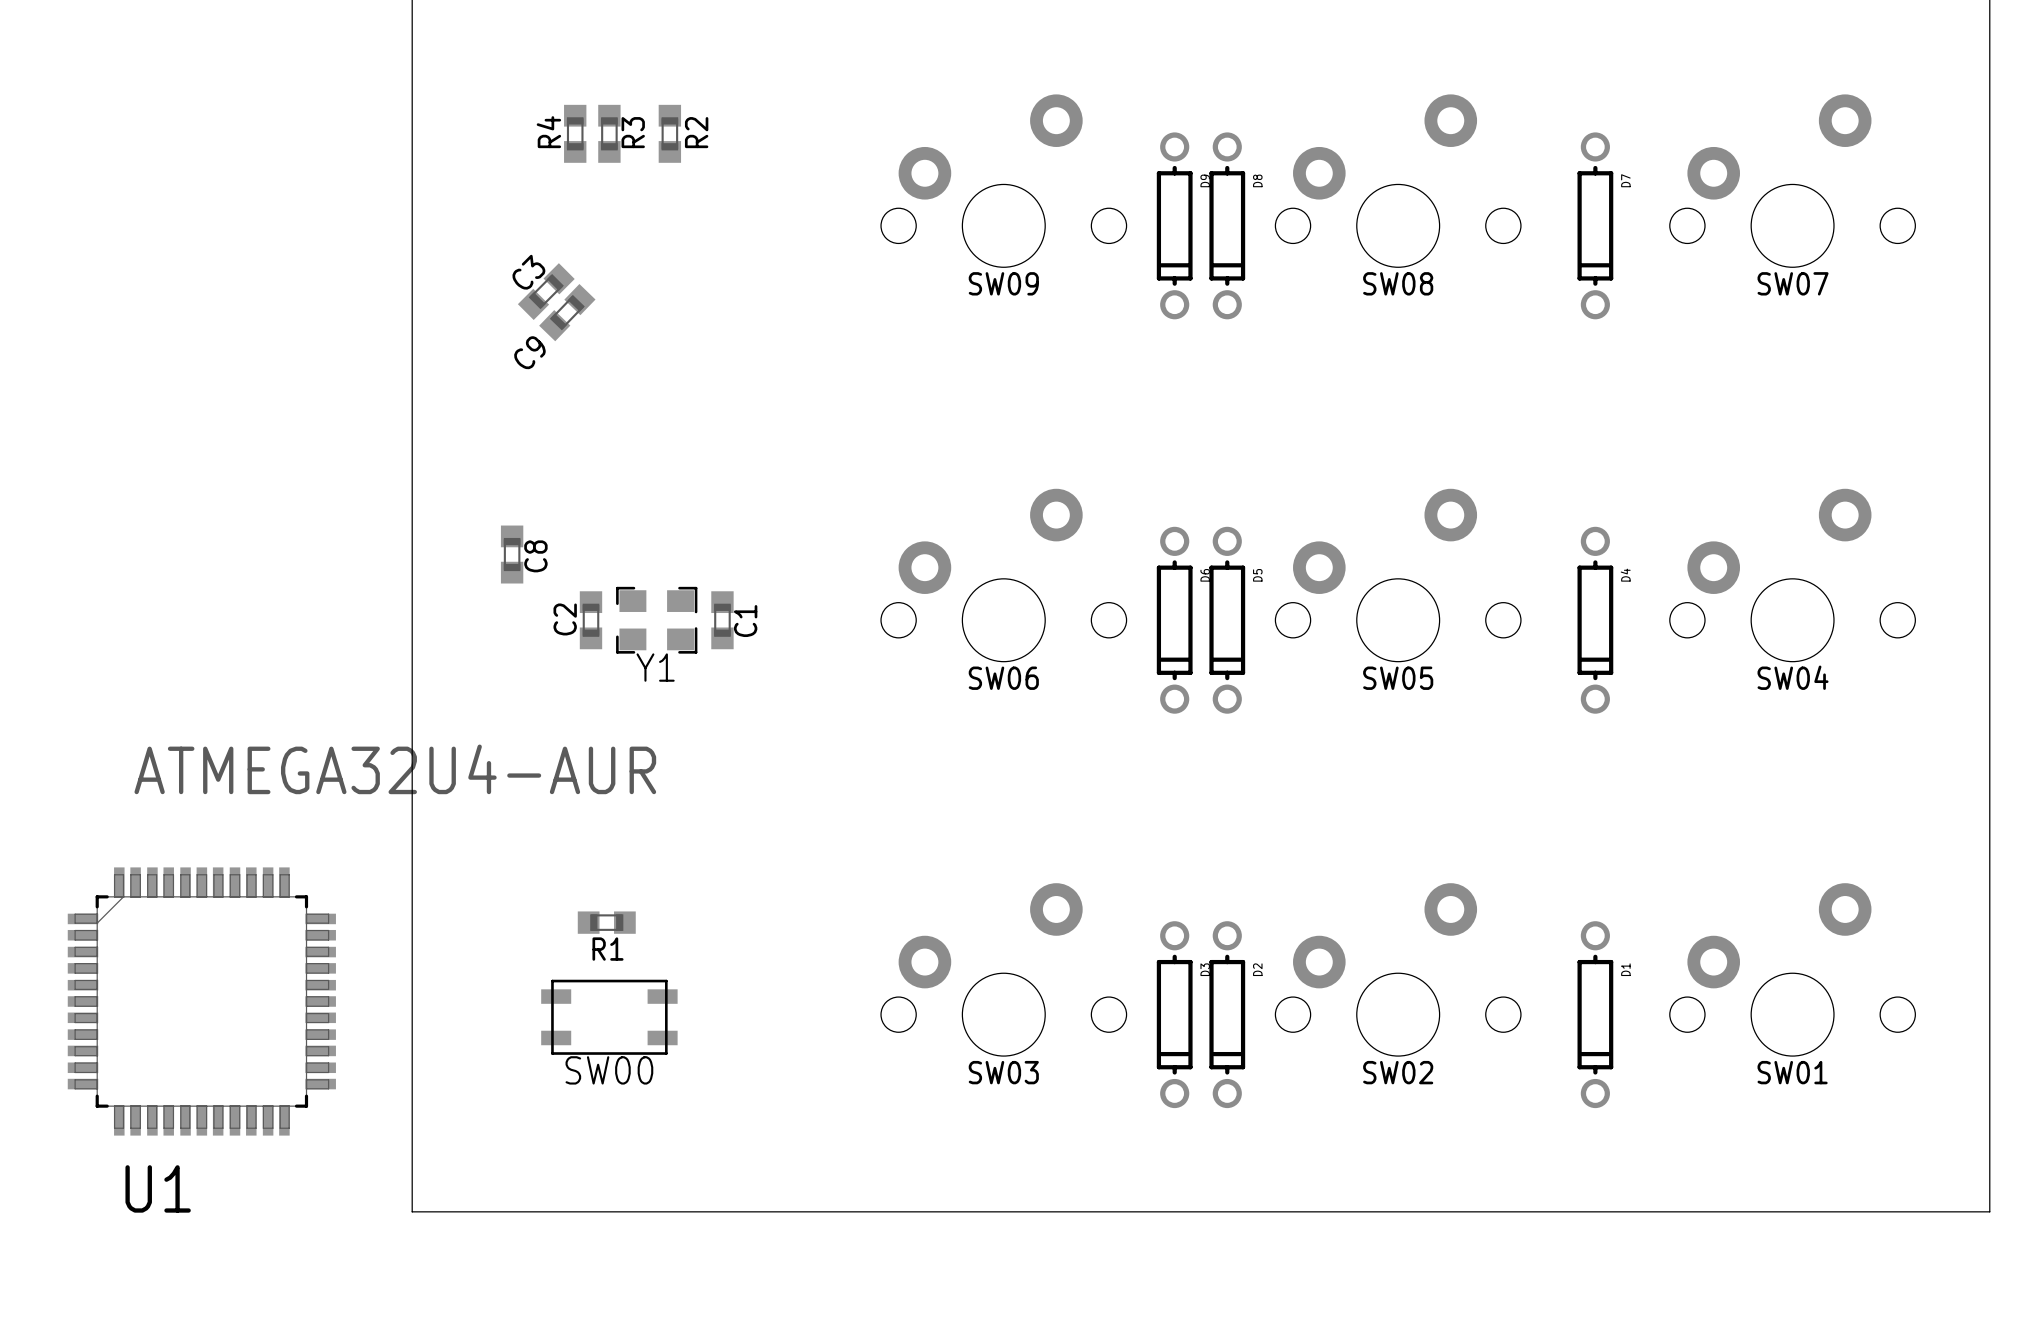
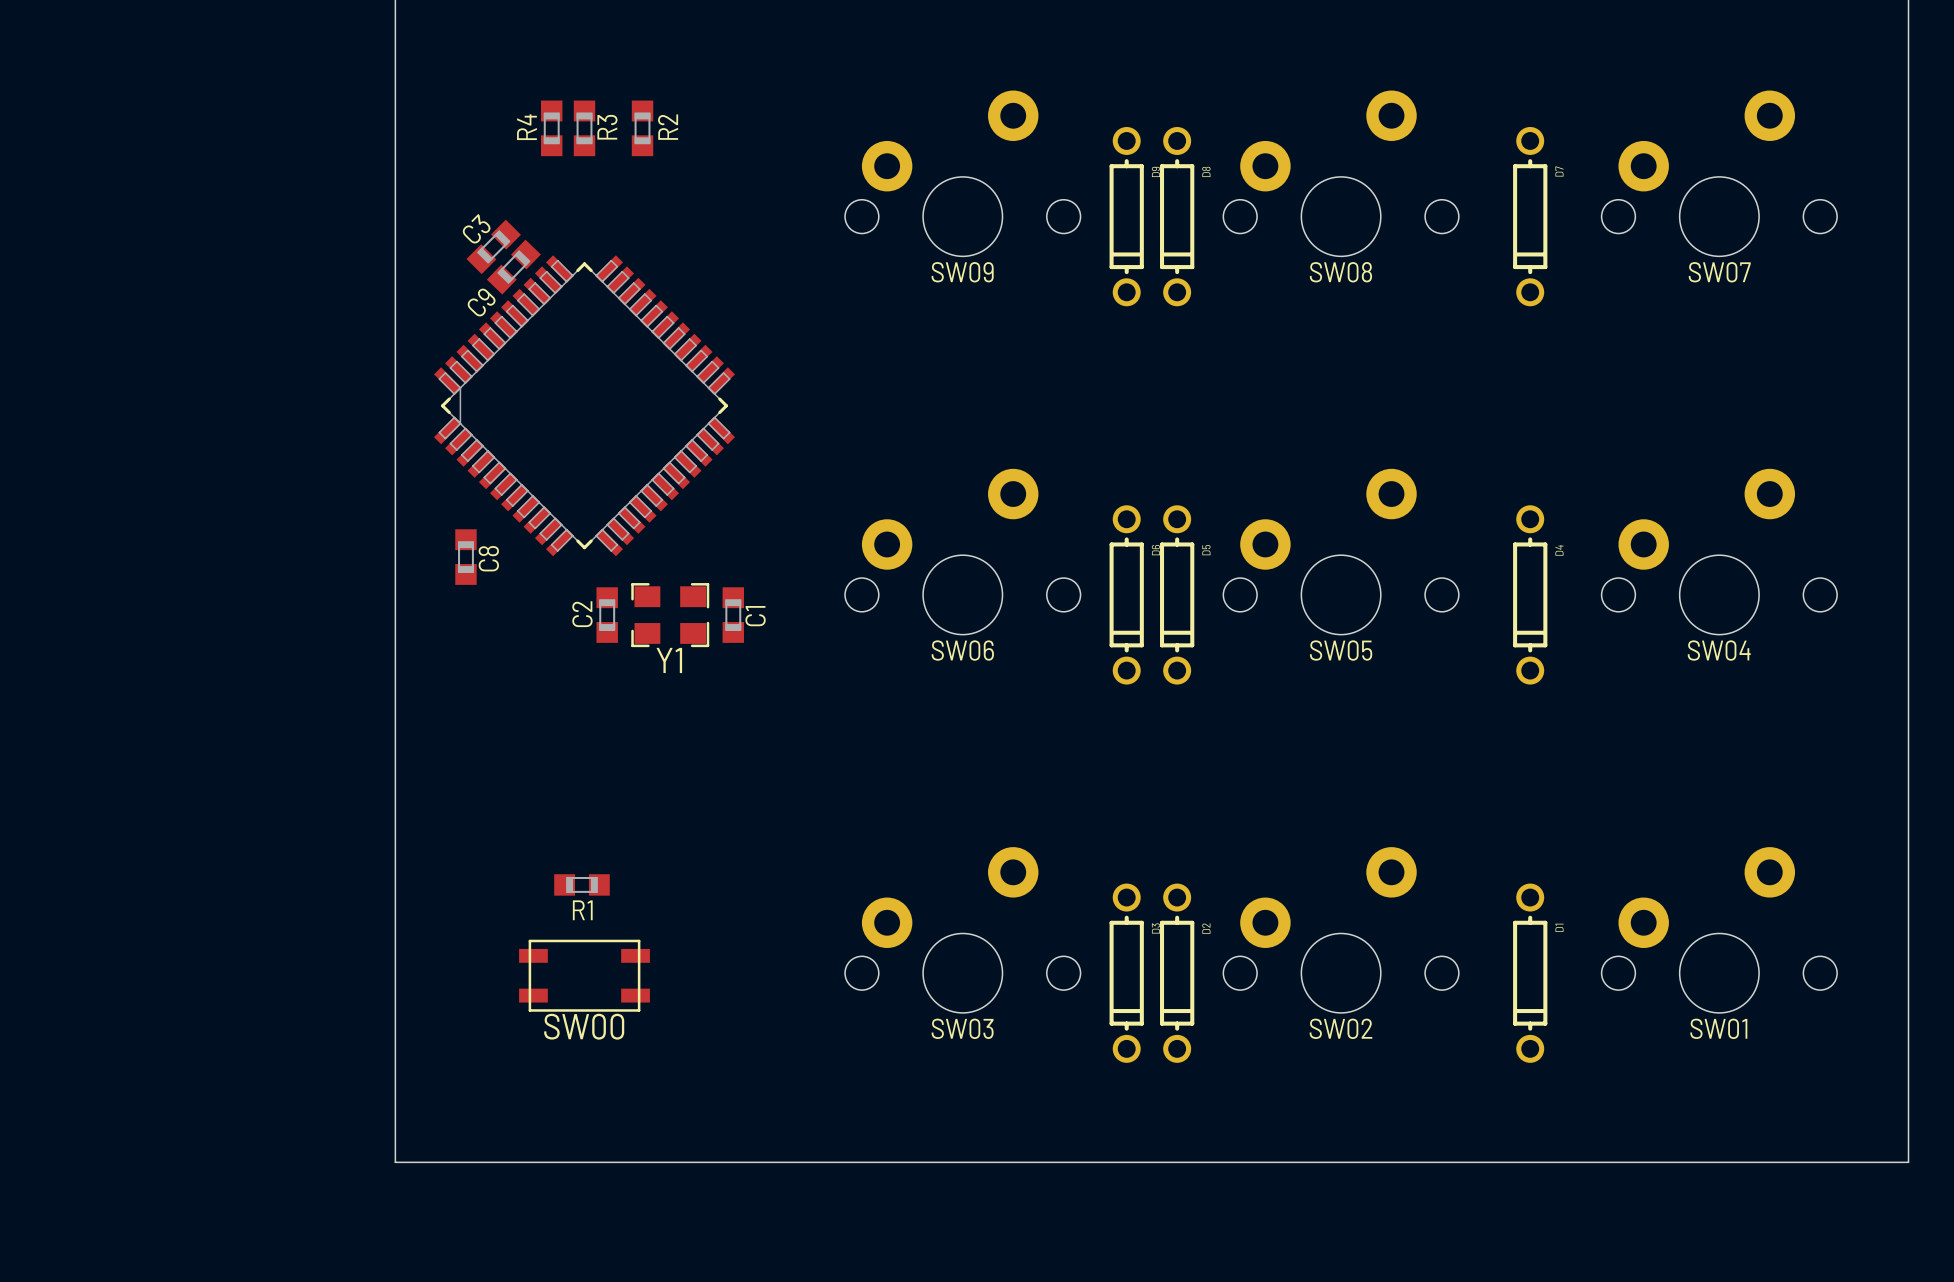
C3 position: (546, 291) -> (493, 246)
C9 position: (567, 312) -> (513, 267)
part: none -> (584, 405)
C8 position: (512, 554) -> (465, 557)
C2 position: (590, 620) -> (607, 615)
Y1 position: (656, 620) -> (670, 615)
C1 position: (722, 620) -> (733, 615)
U1: ATMEGA32U4-AUR (201, 1001) -> none

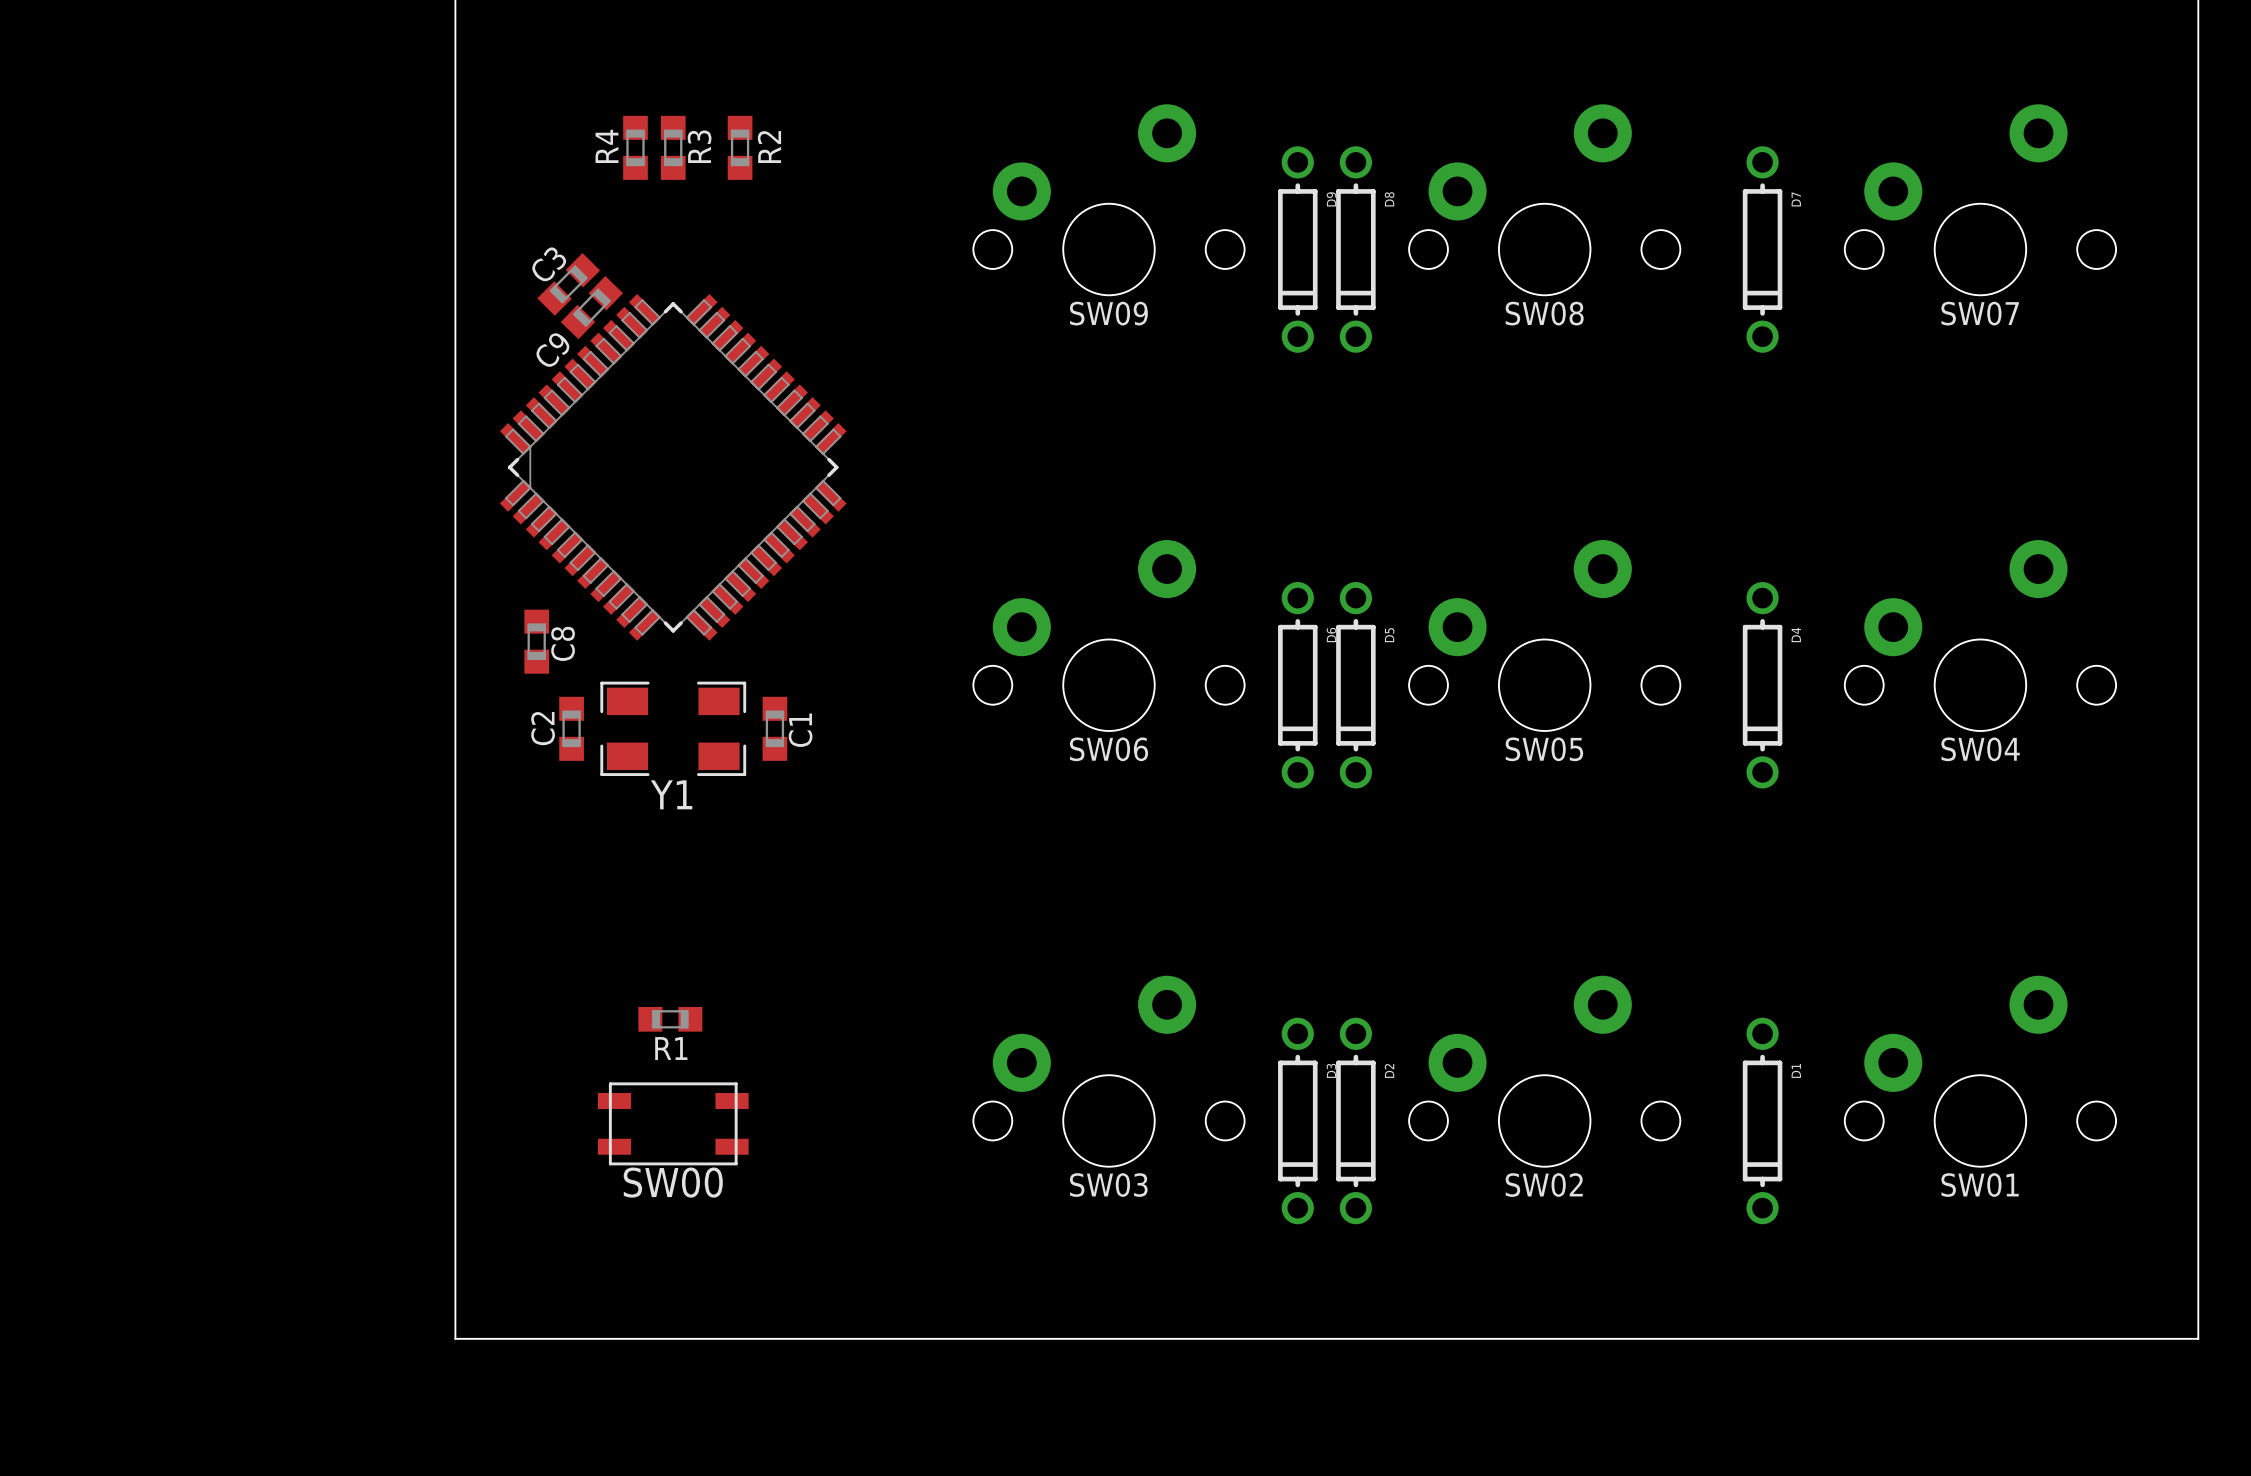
Y1 footprint: [631, 583, 710, 648] -> [600, 681, 747, 777]
C2 position: (607, 615) -> (571, 728)
C1 position: (733, 615) -> (774, 728)

